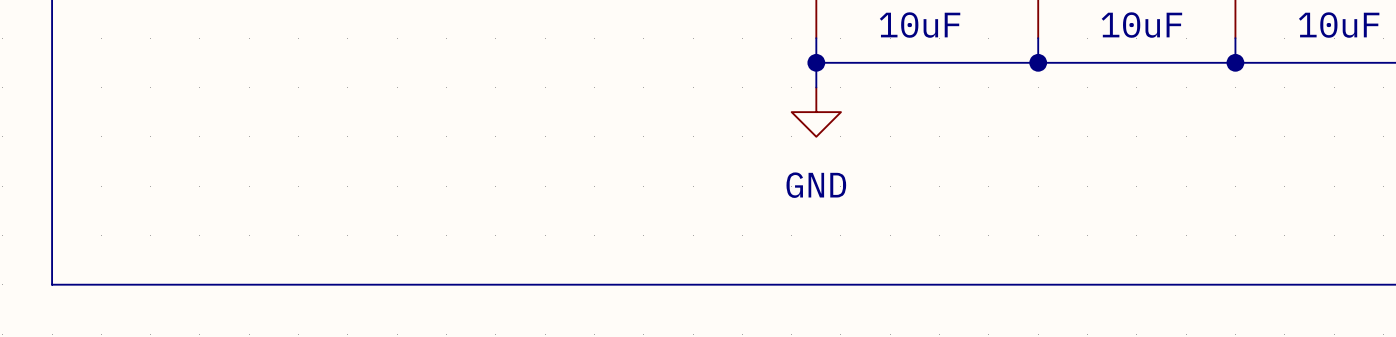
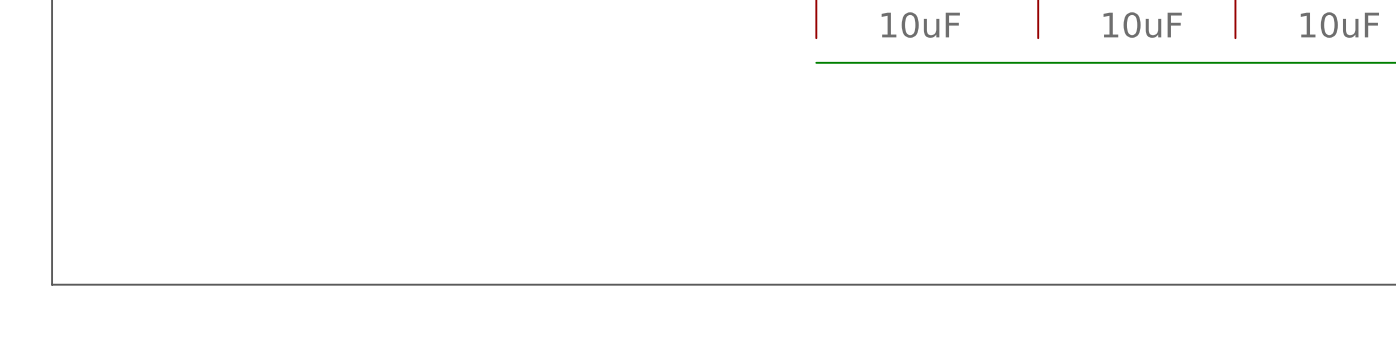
wire: (816, 38) (816, 87) -> none
wire: (1038, 38) (1038, 62) -> none
wire: (1235, 38) (1235, 62) -> none
junction: (816, 62) -> none
junction: (1038, 62) -> none
junction: (1235, 62) -> none
power symbol: GND (816, 112) -> none

